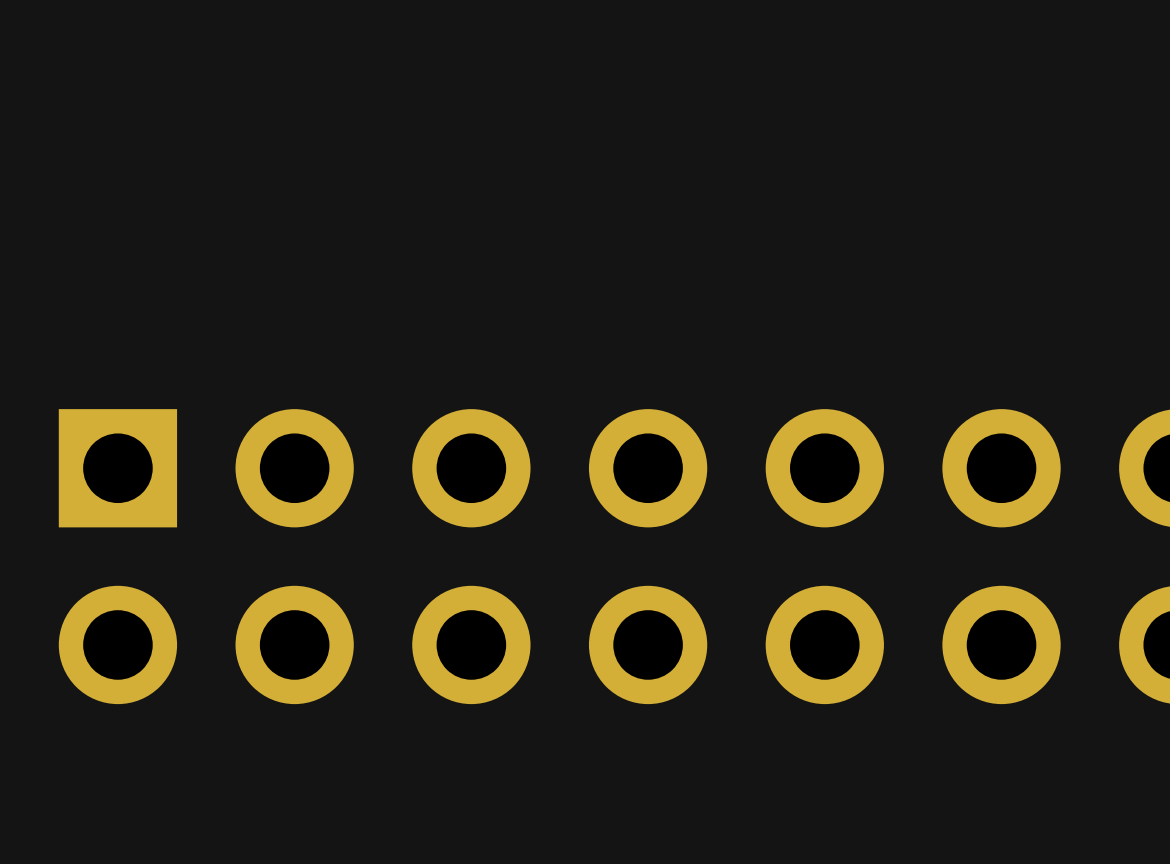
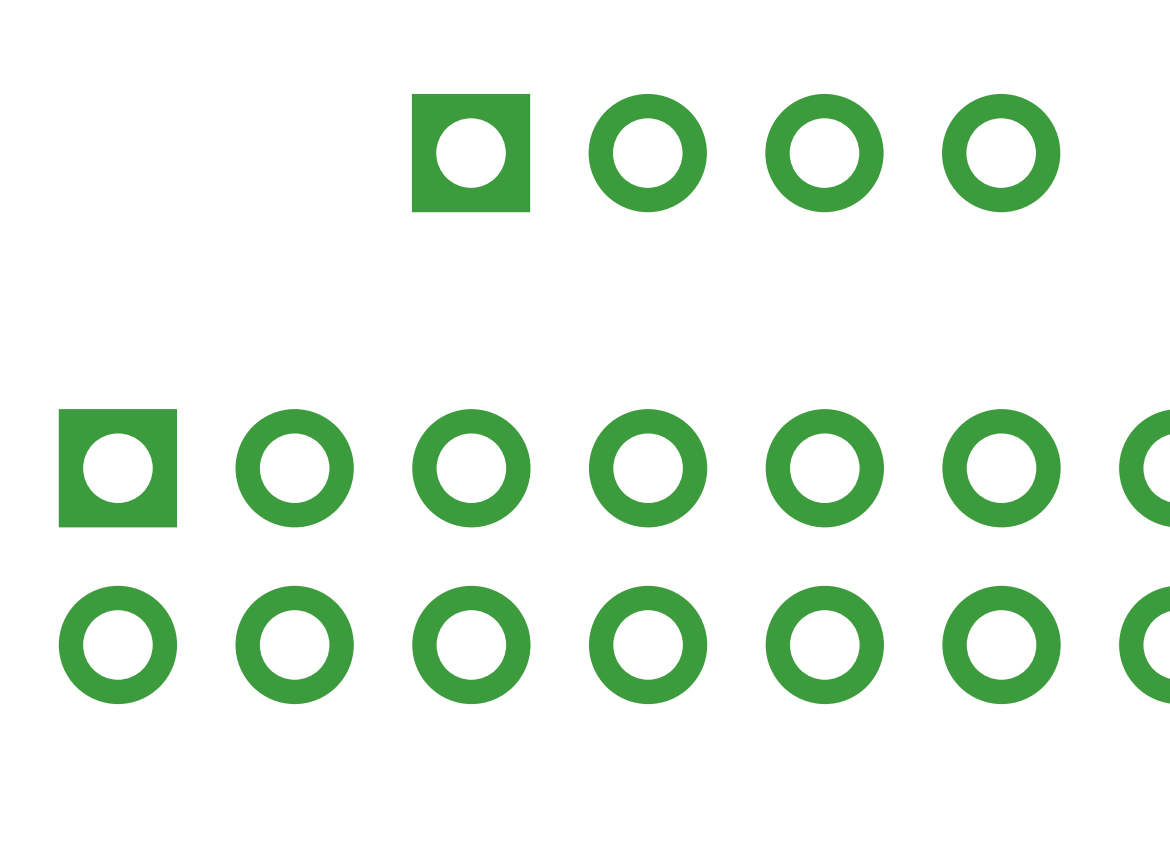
part: none -> (736, 153)

